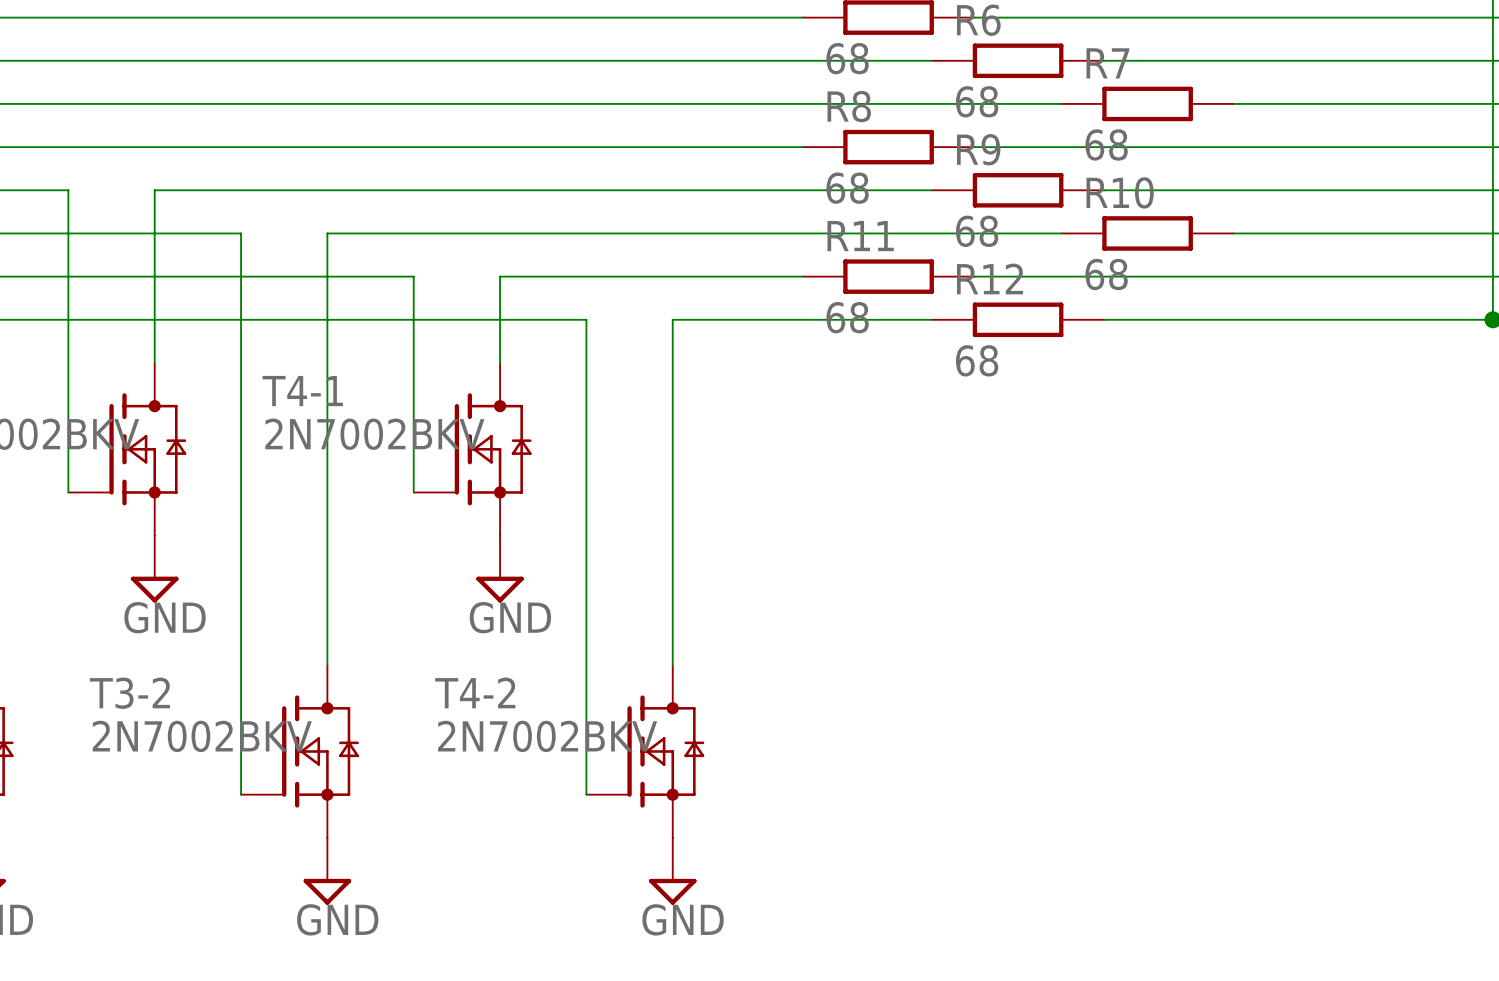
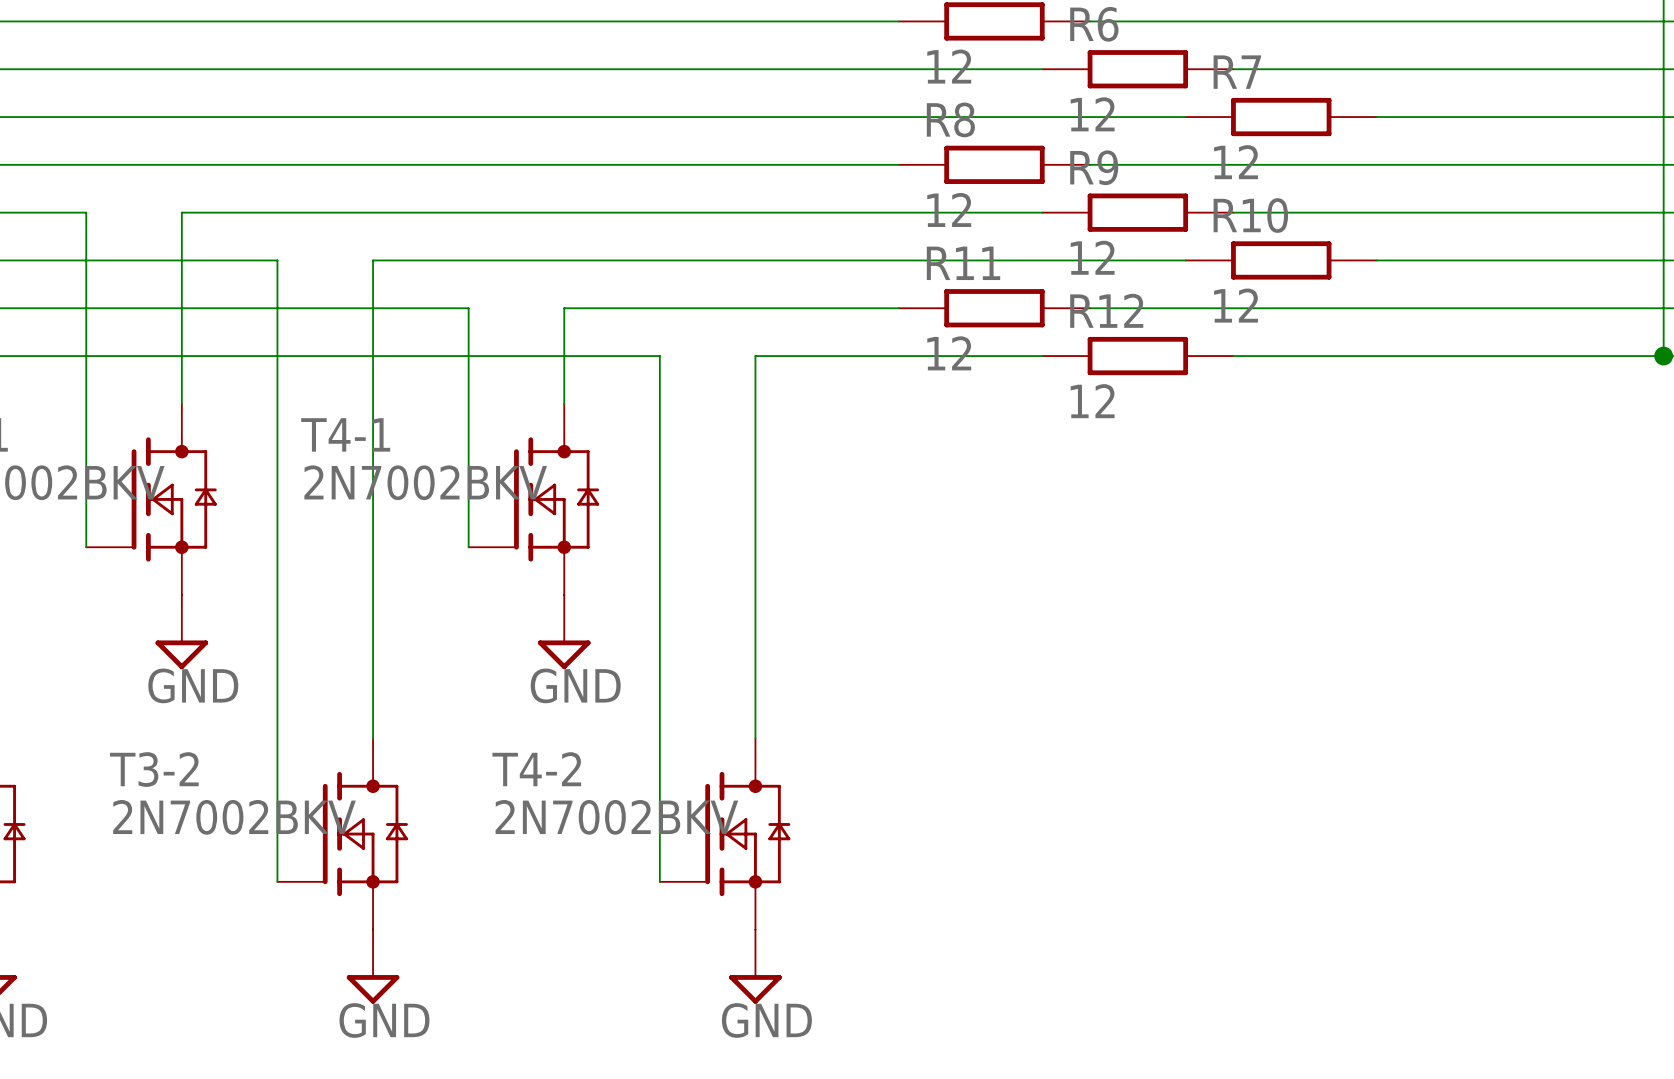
part value: 68 (847, 58) -> 12 (949, 66)
R6 value: 68 (977, 101) -> 12 (1092, 114)
R7 value: 68 (1106, 144) -> 12 (1236, 162)
R8 value: 68 (847, 188) -> 12 (949, 209)
R9 value: 68 (977, 231) -> 12 (1092, 257)
R10 value: 68 (1106, 274) -> 12 (1236, 305)
R11 value: 68 (847, 317) -> 12 (949, 353)
R12 value: 68 (977, 360) -> 12 (1092, 401)

